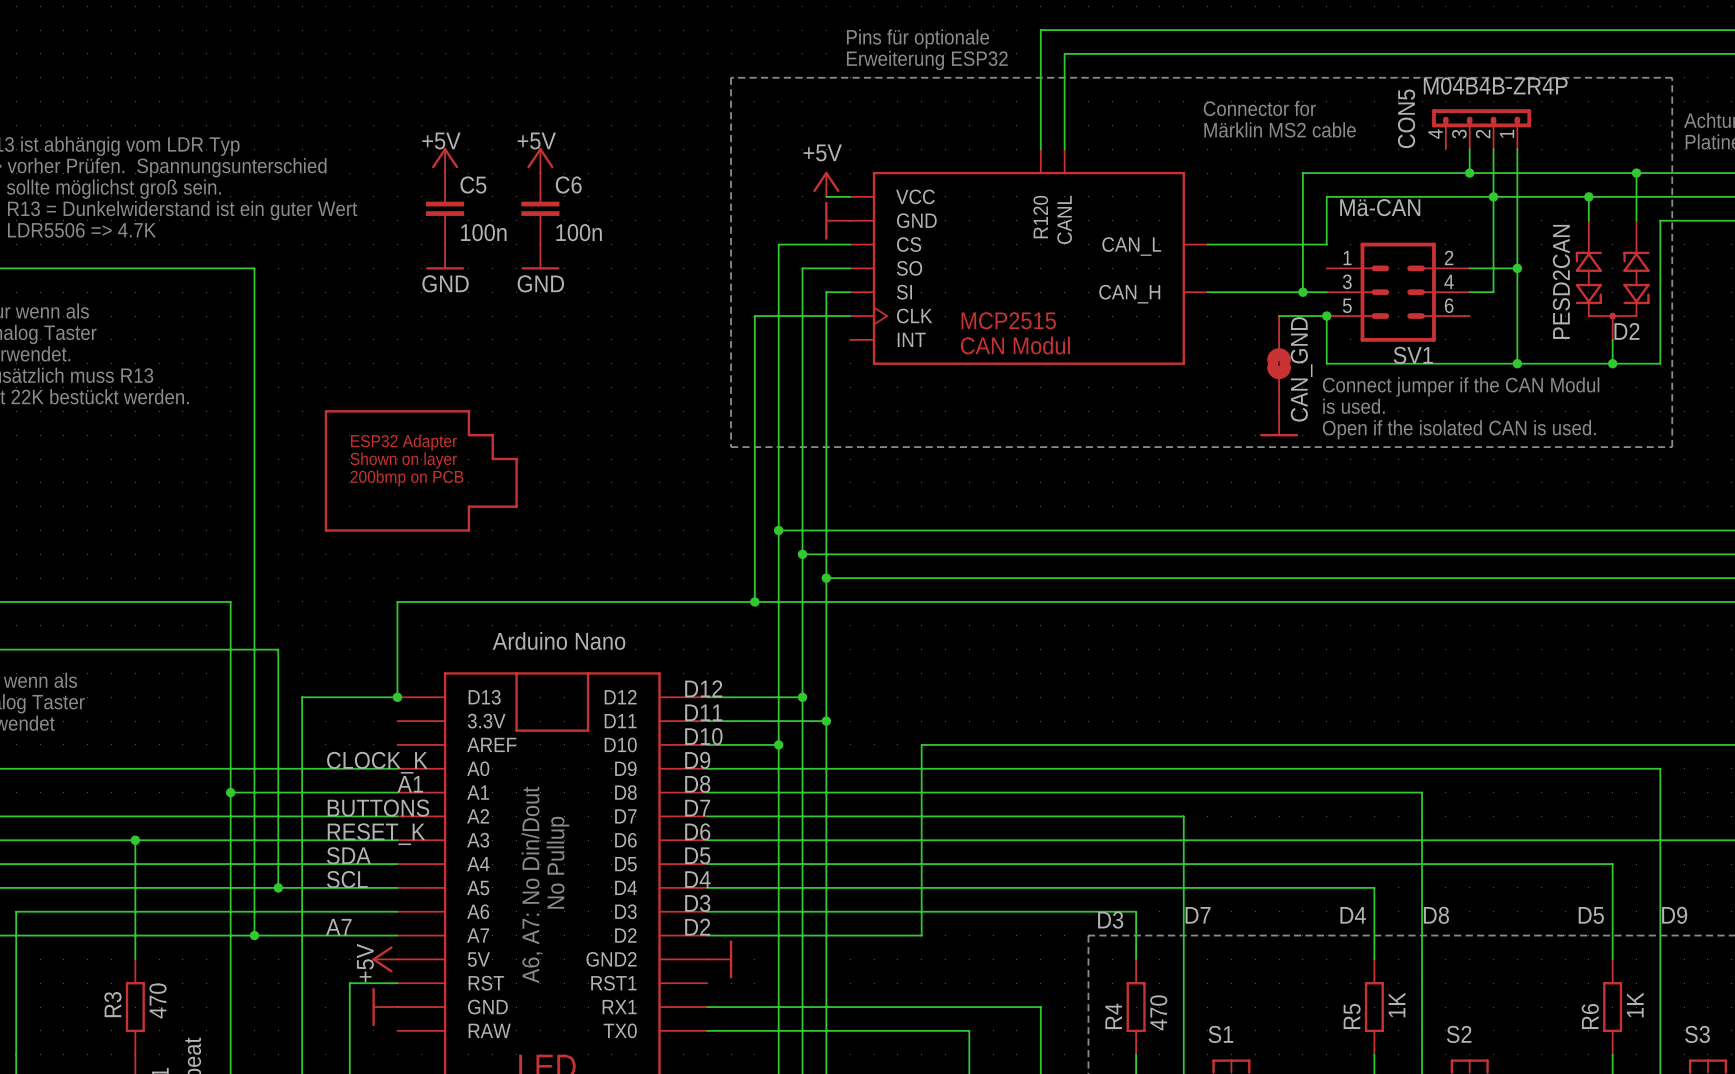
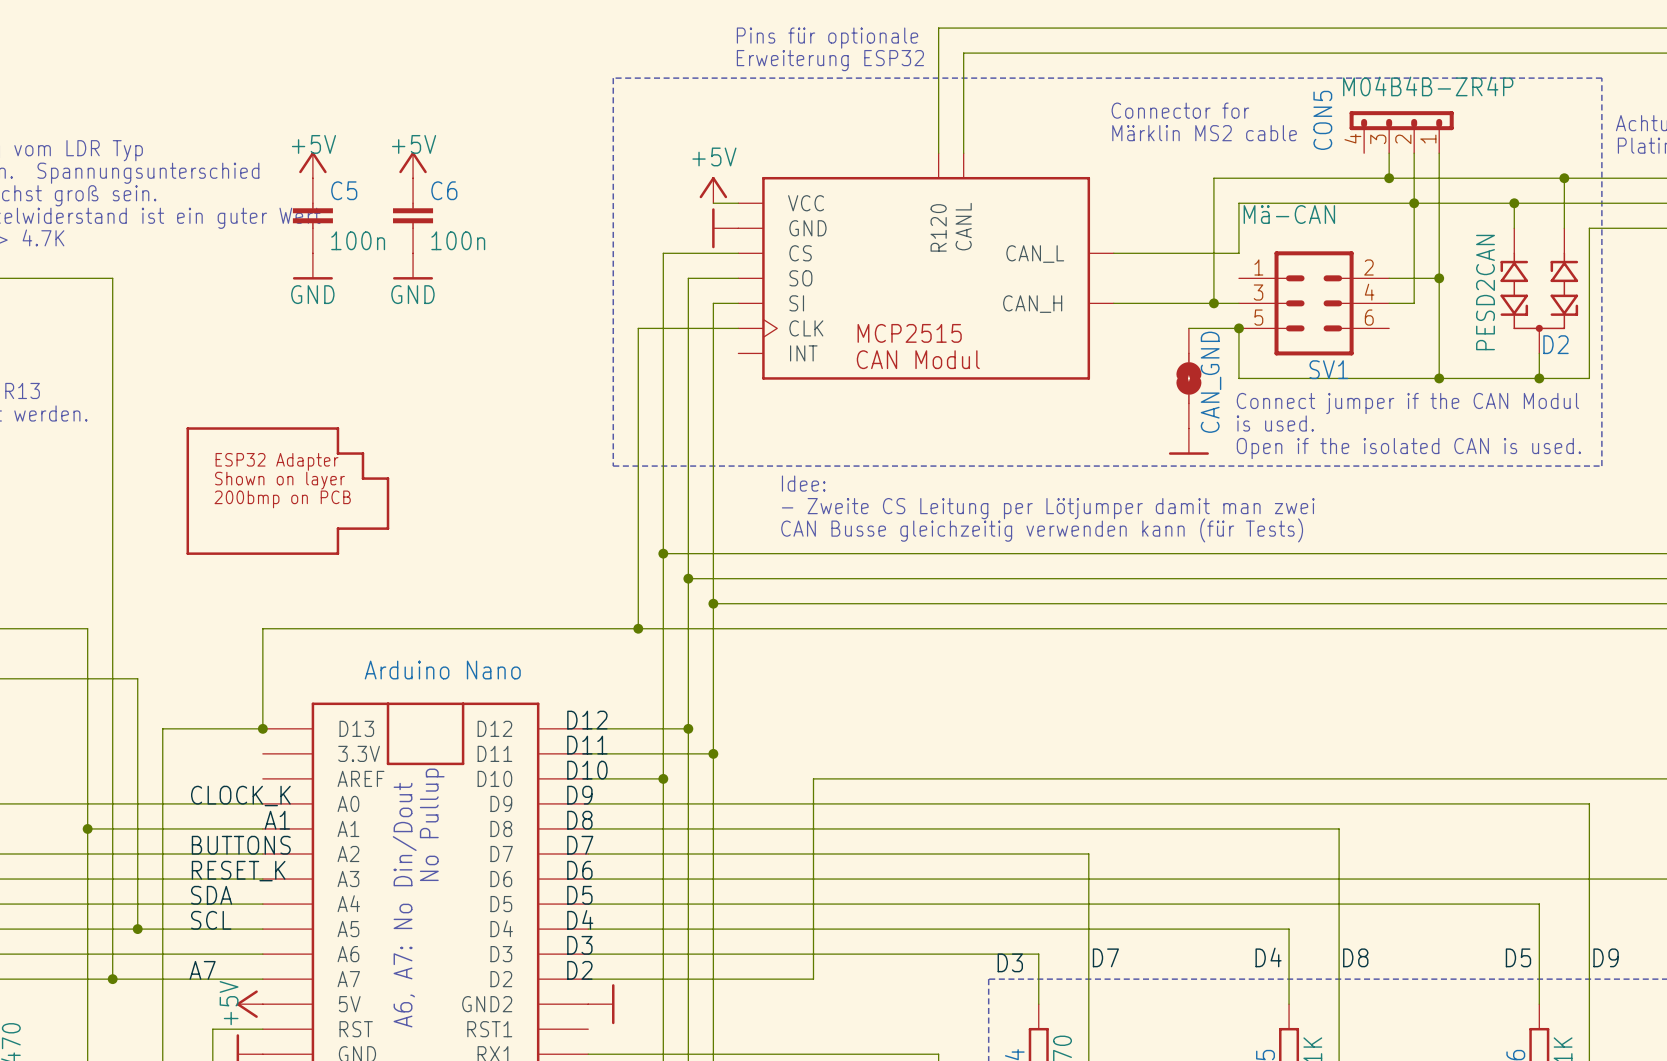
text: none -> Idee: (803, 483)
text: none -> - Zweite CS Leitung per Lötjumper damit man zwei (1048, 508)
text: none -> CAN Busse gleichzeitig verwenden kann (für Tests) (1042, 530)

